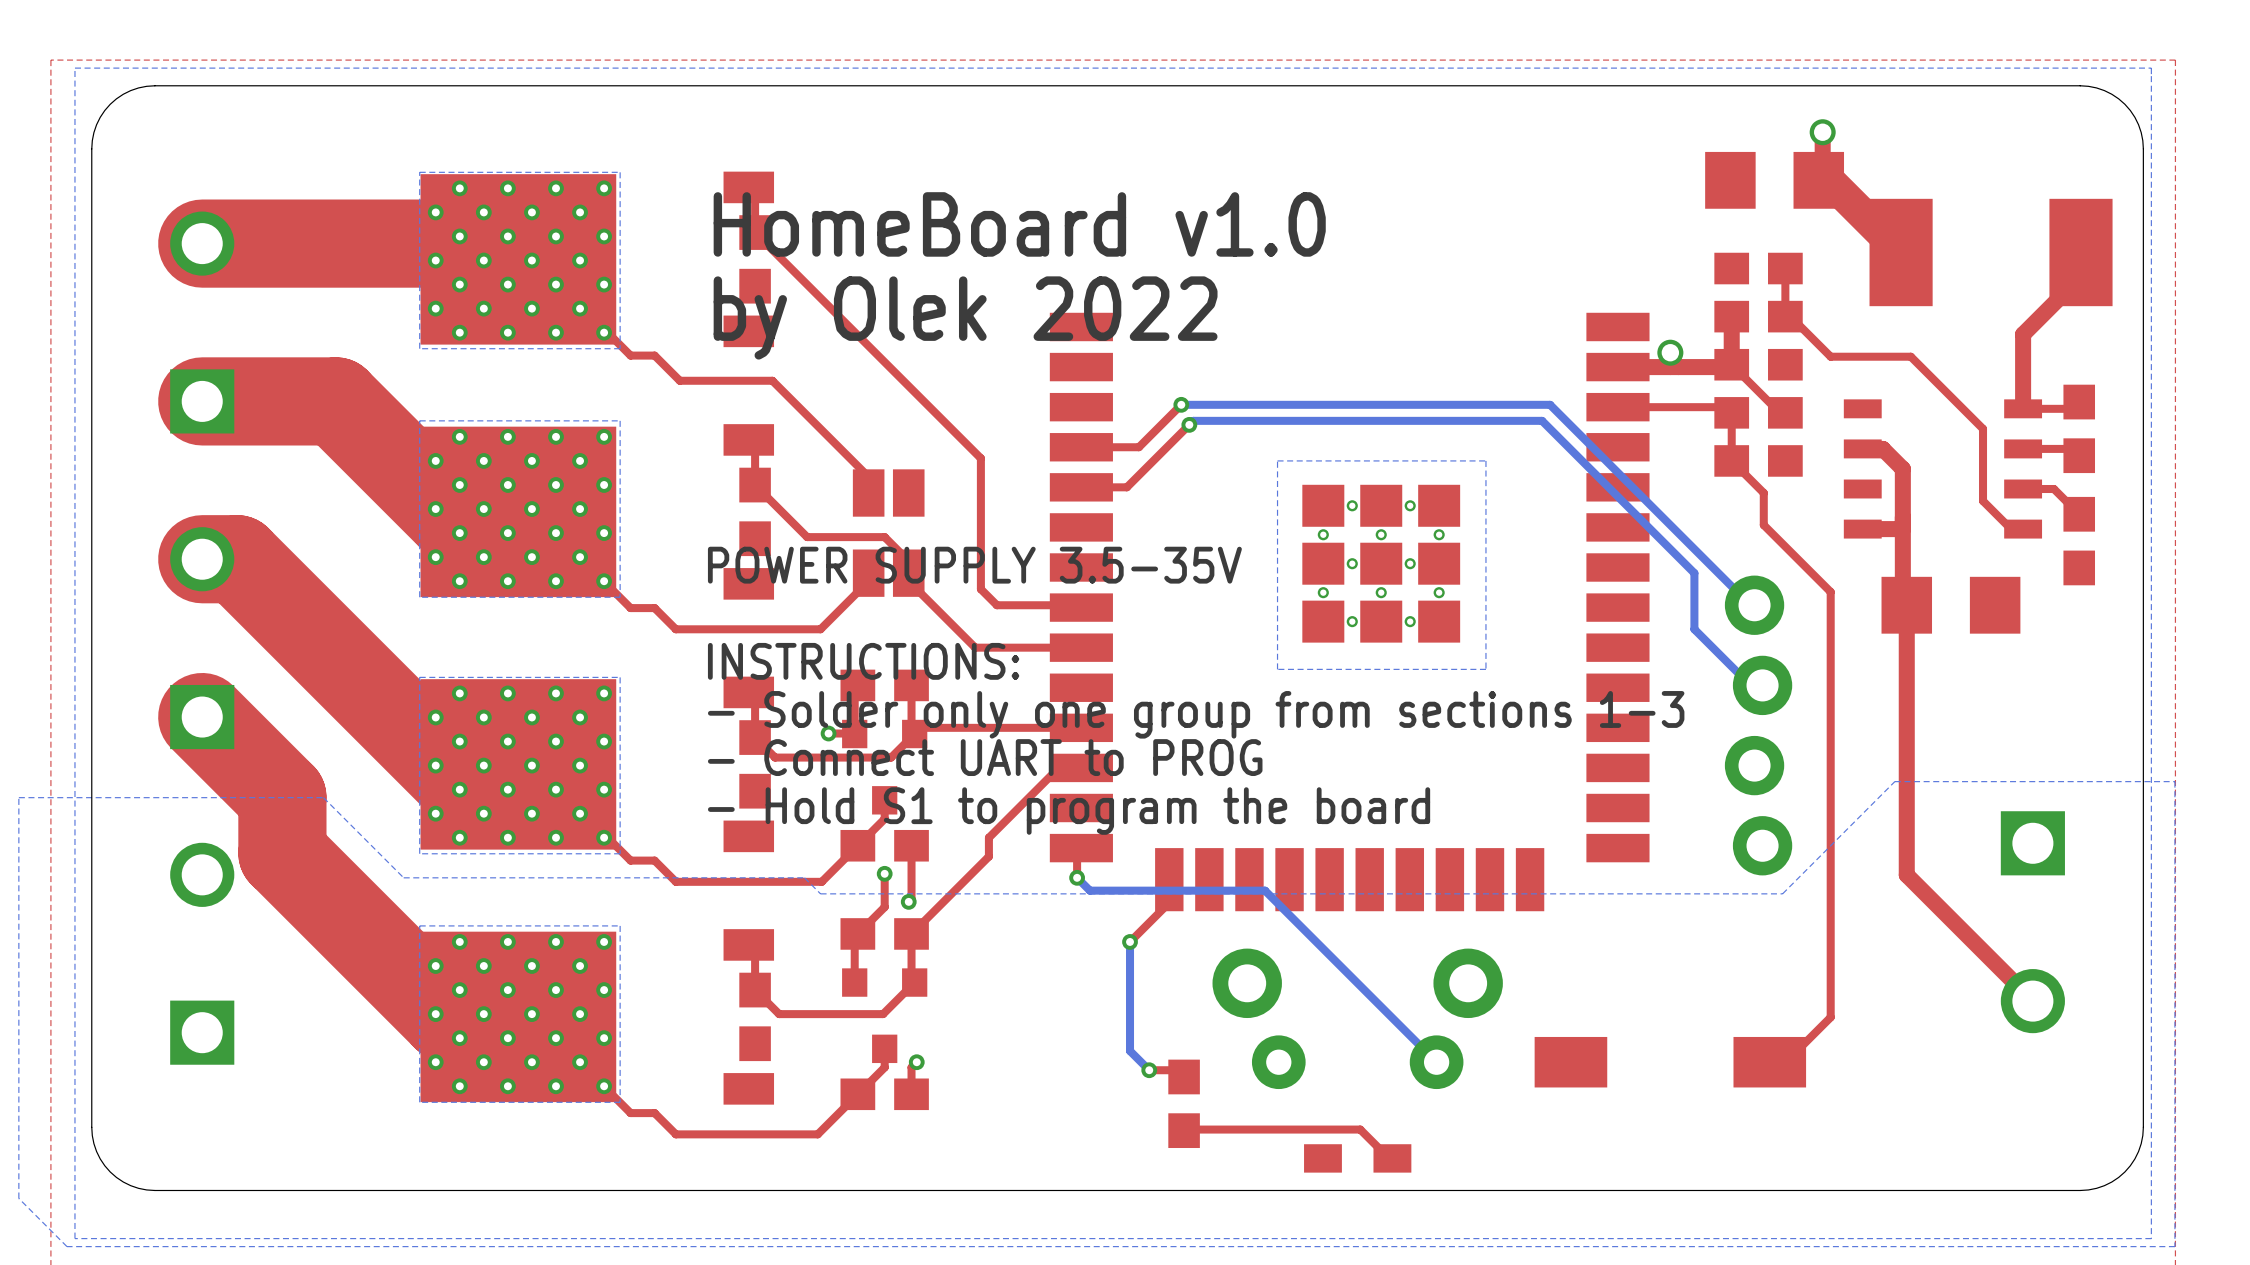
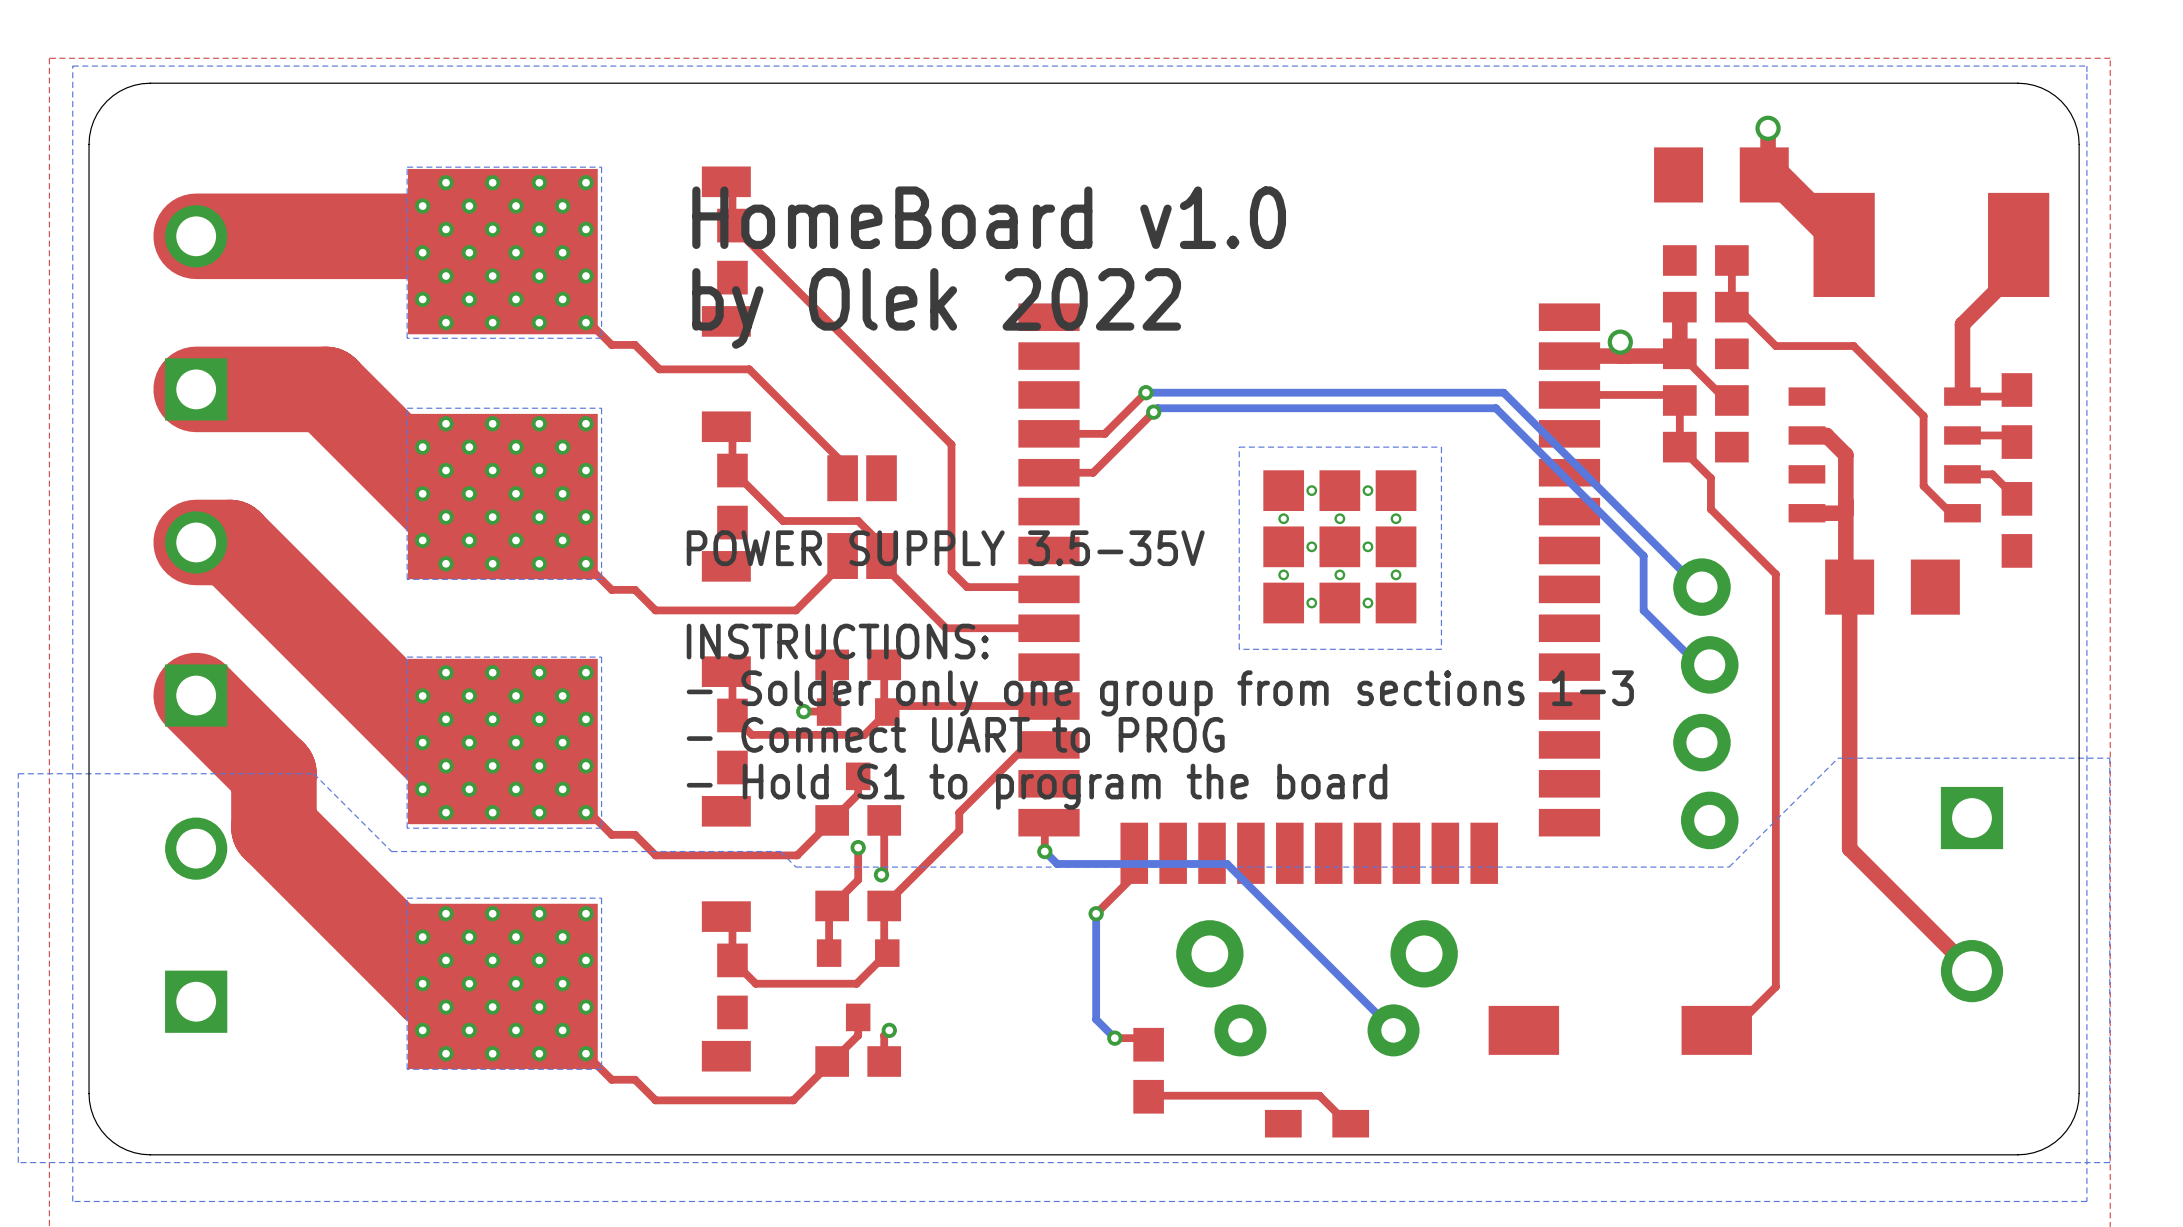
bottom zone outline: (2174, 1198) (2174, 1246) (66, 1246) (18, 1198) -> (2109, 1162) (18, 1162)

